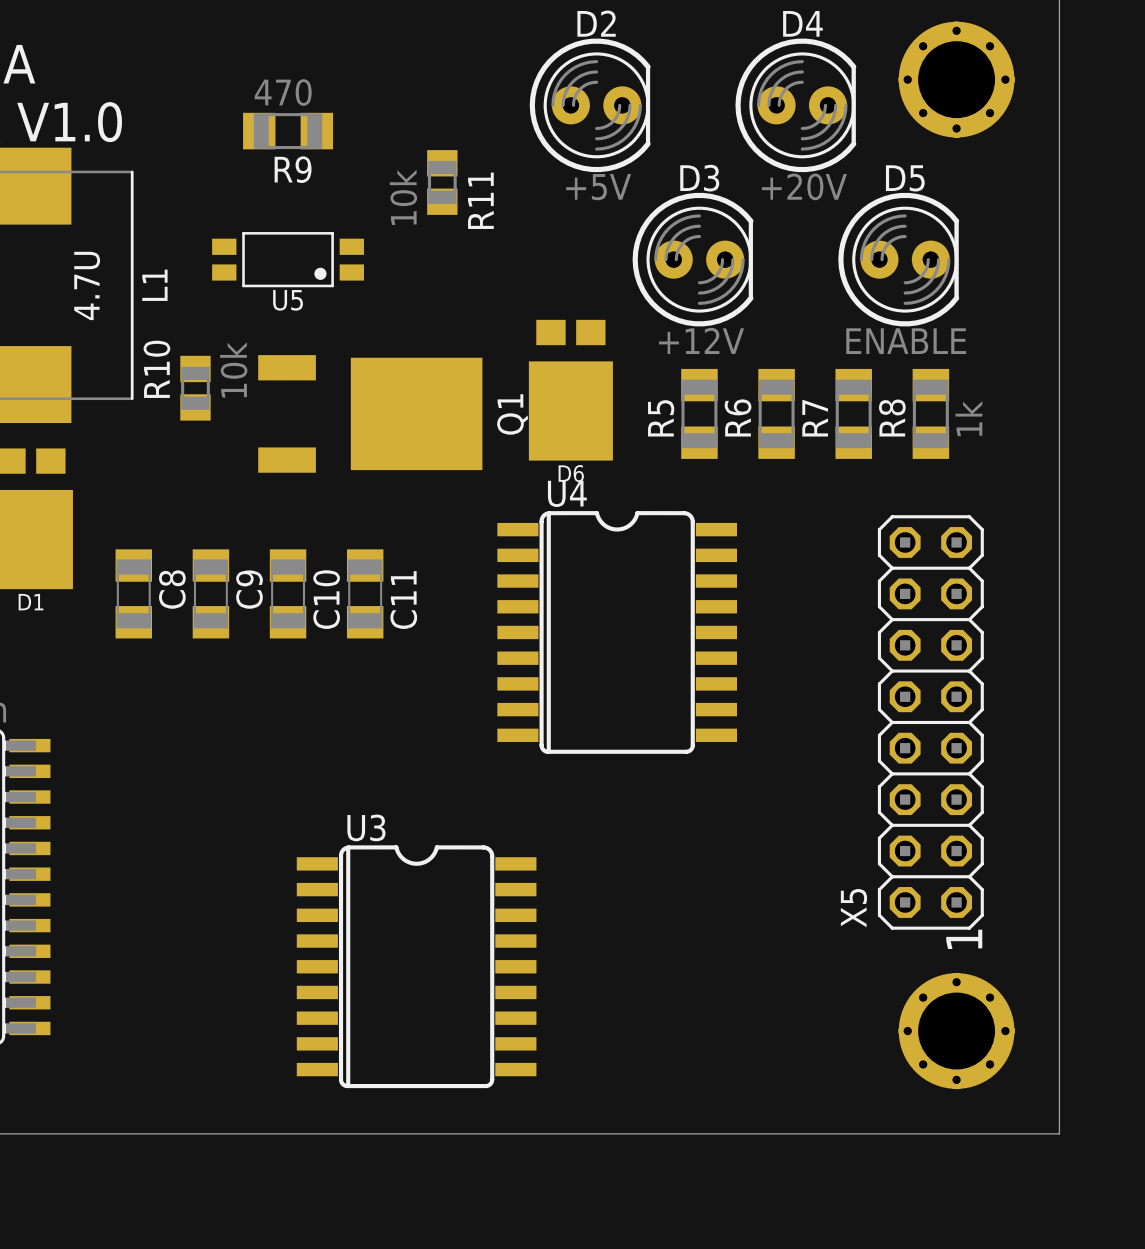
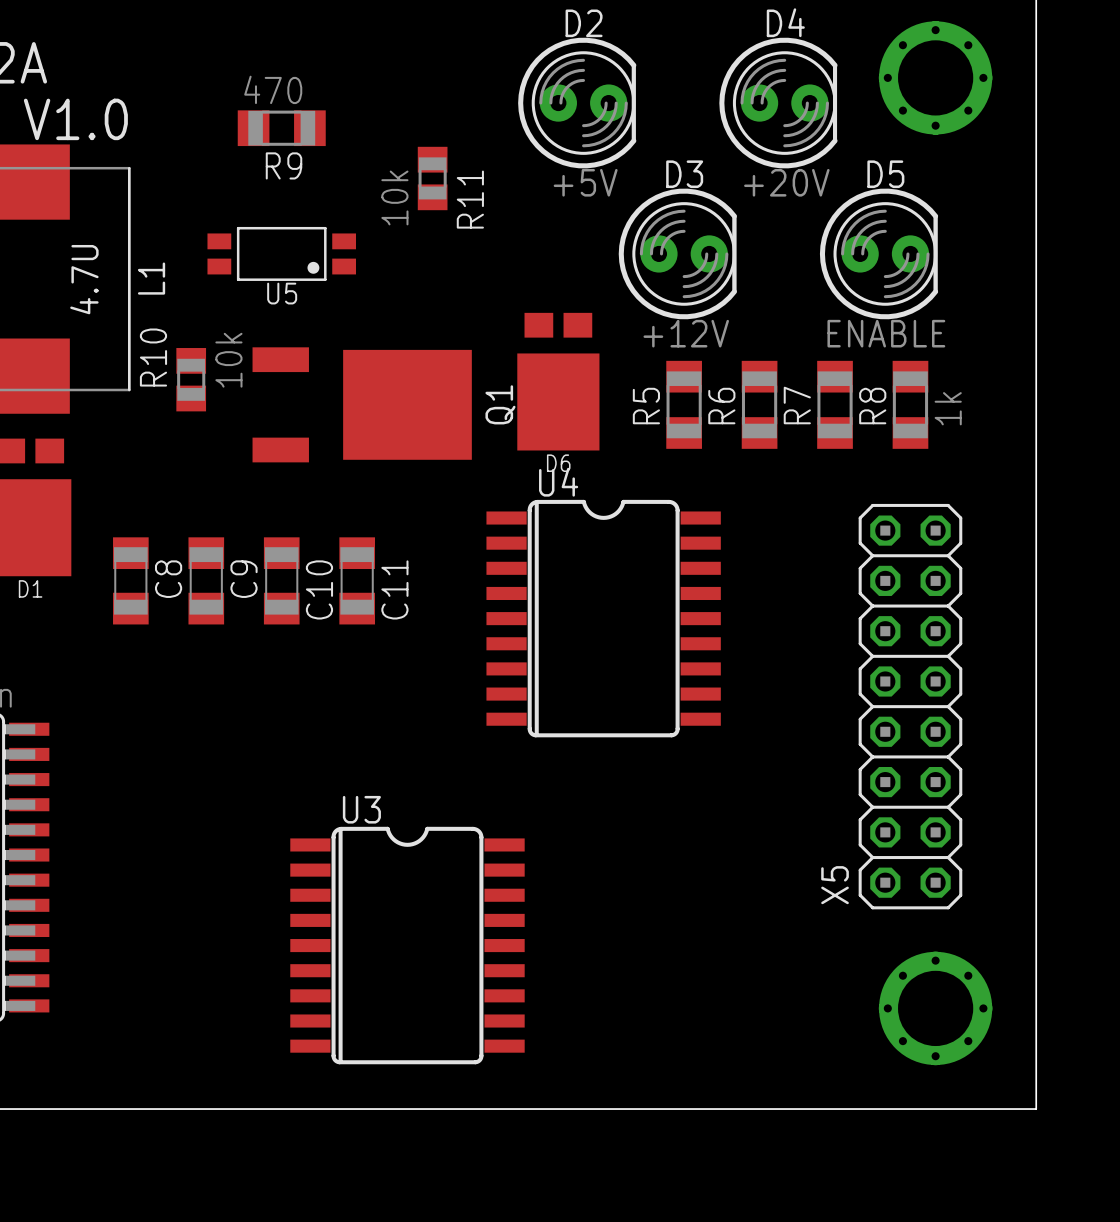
text: 1 (964, 939) -> none

